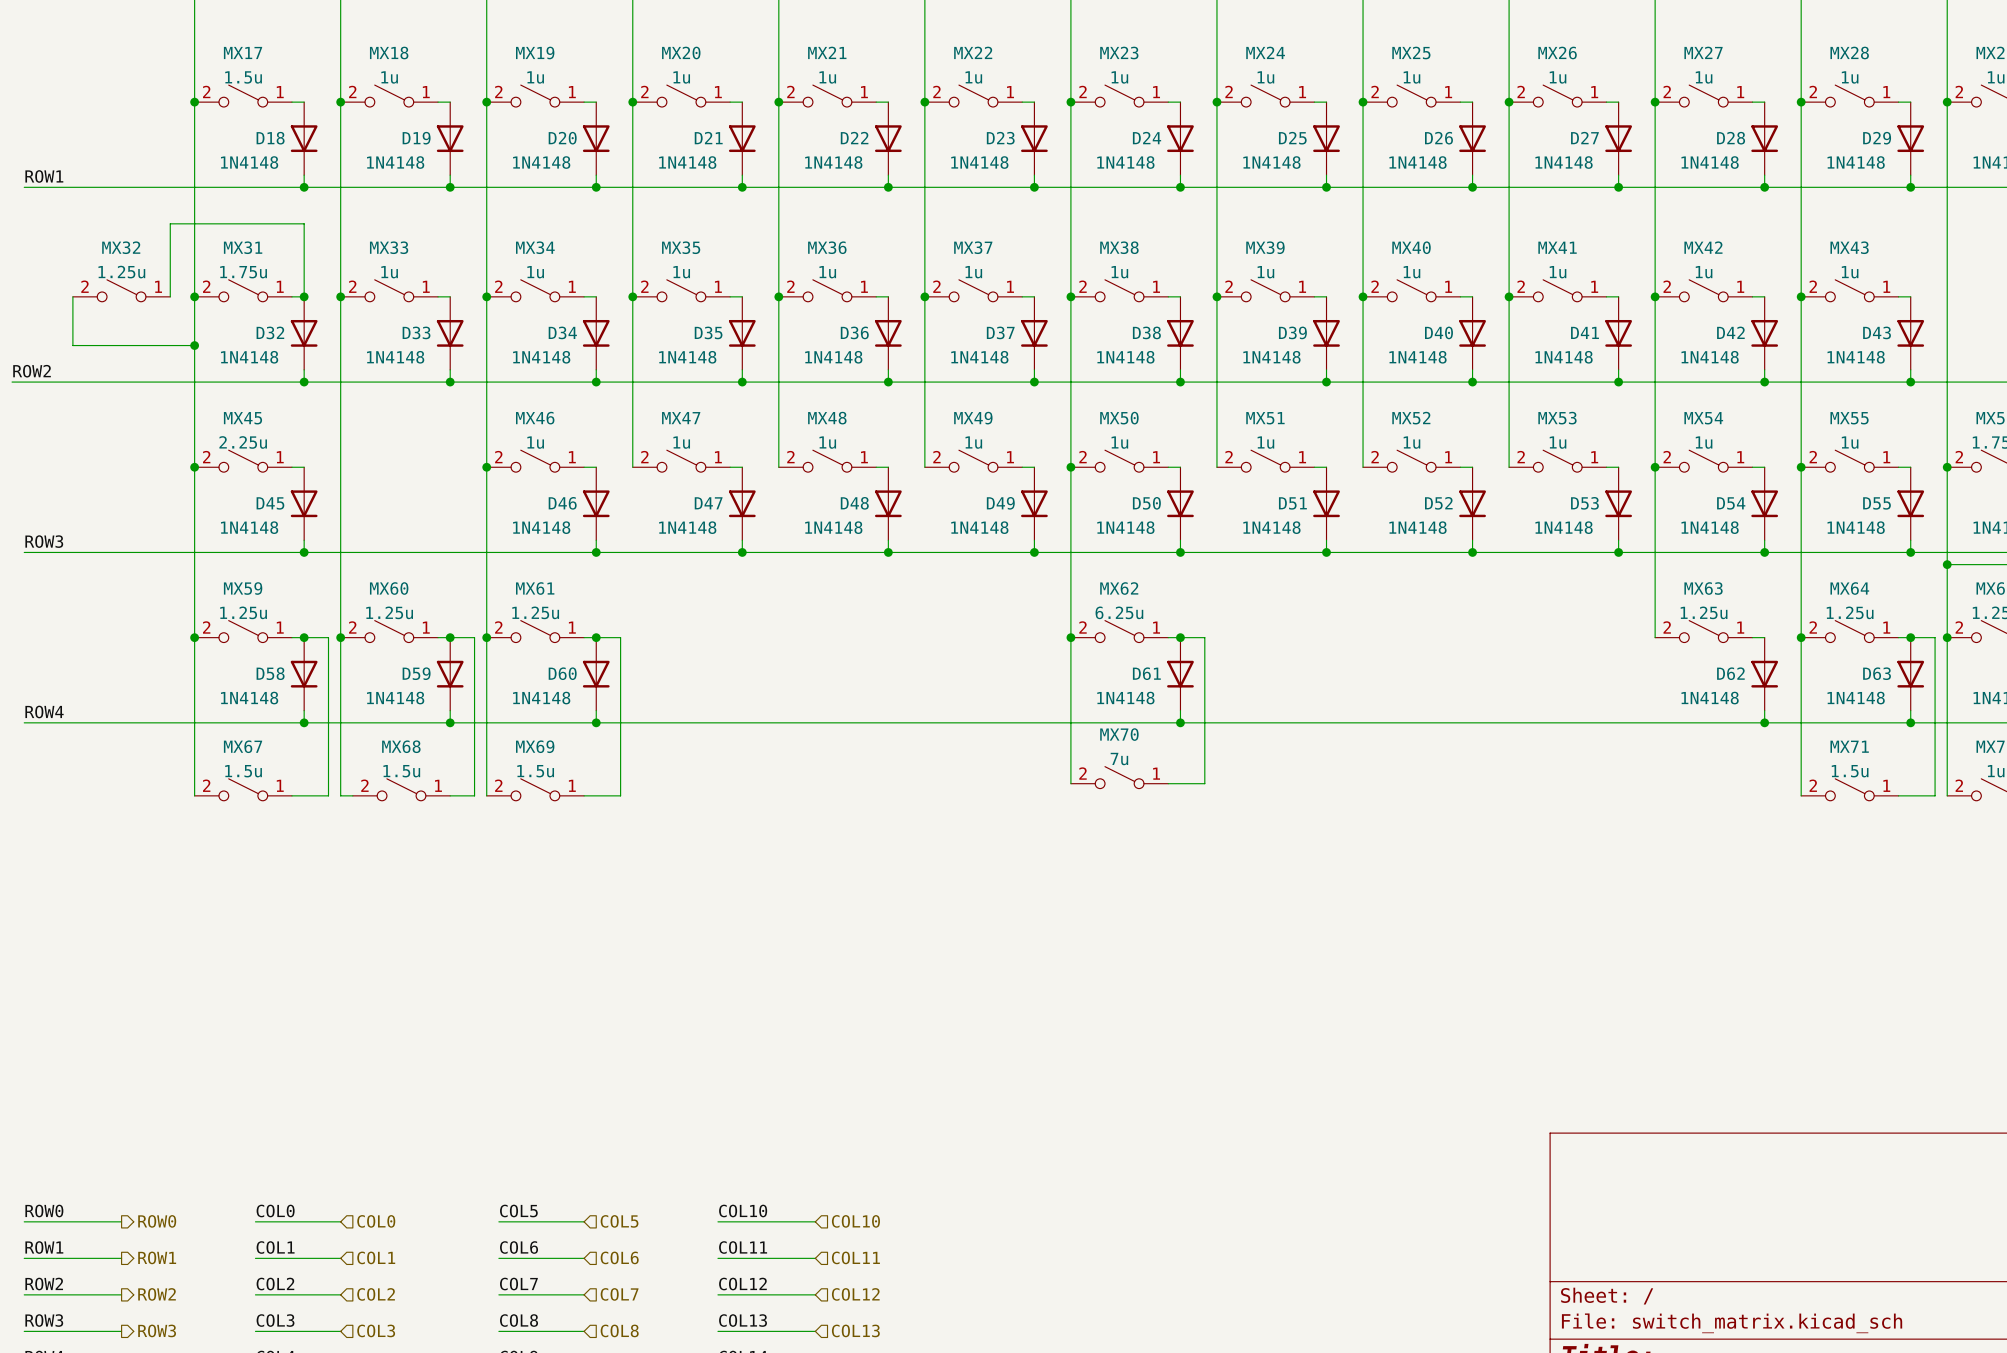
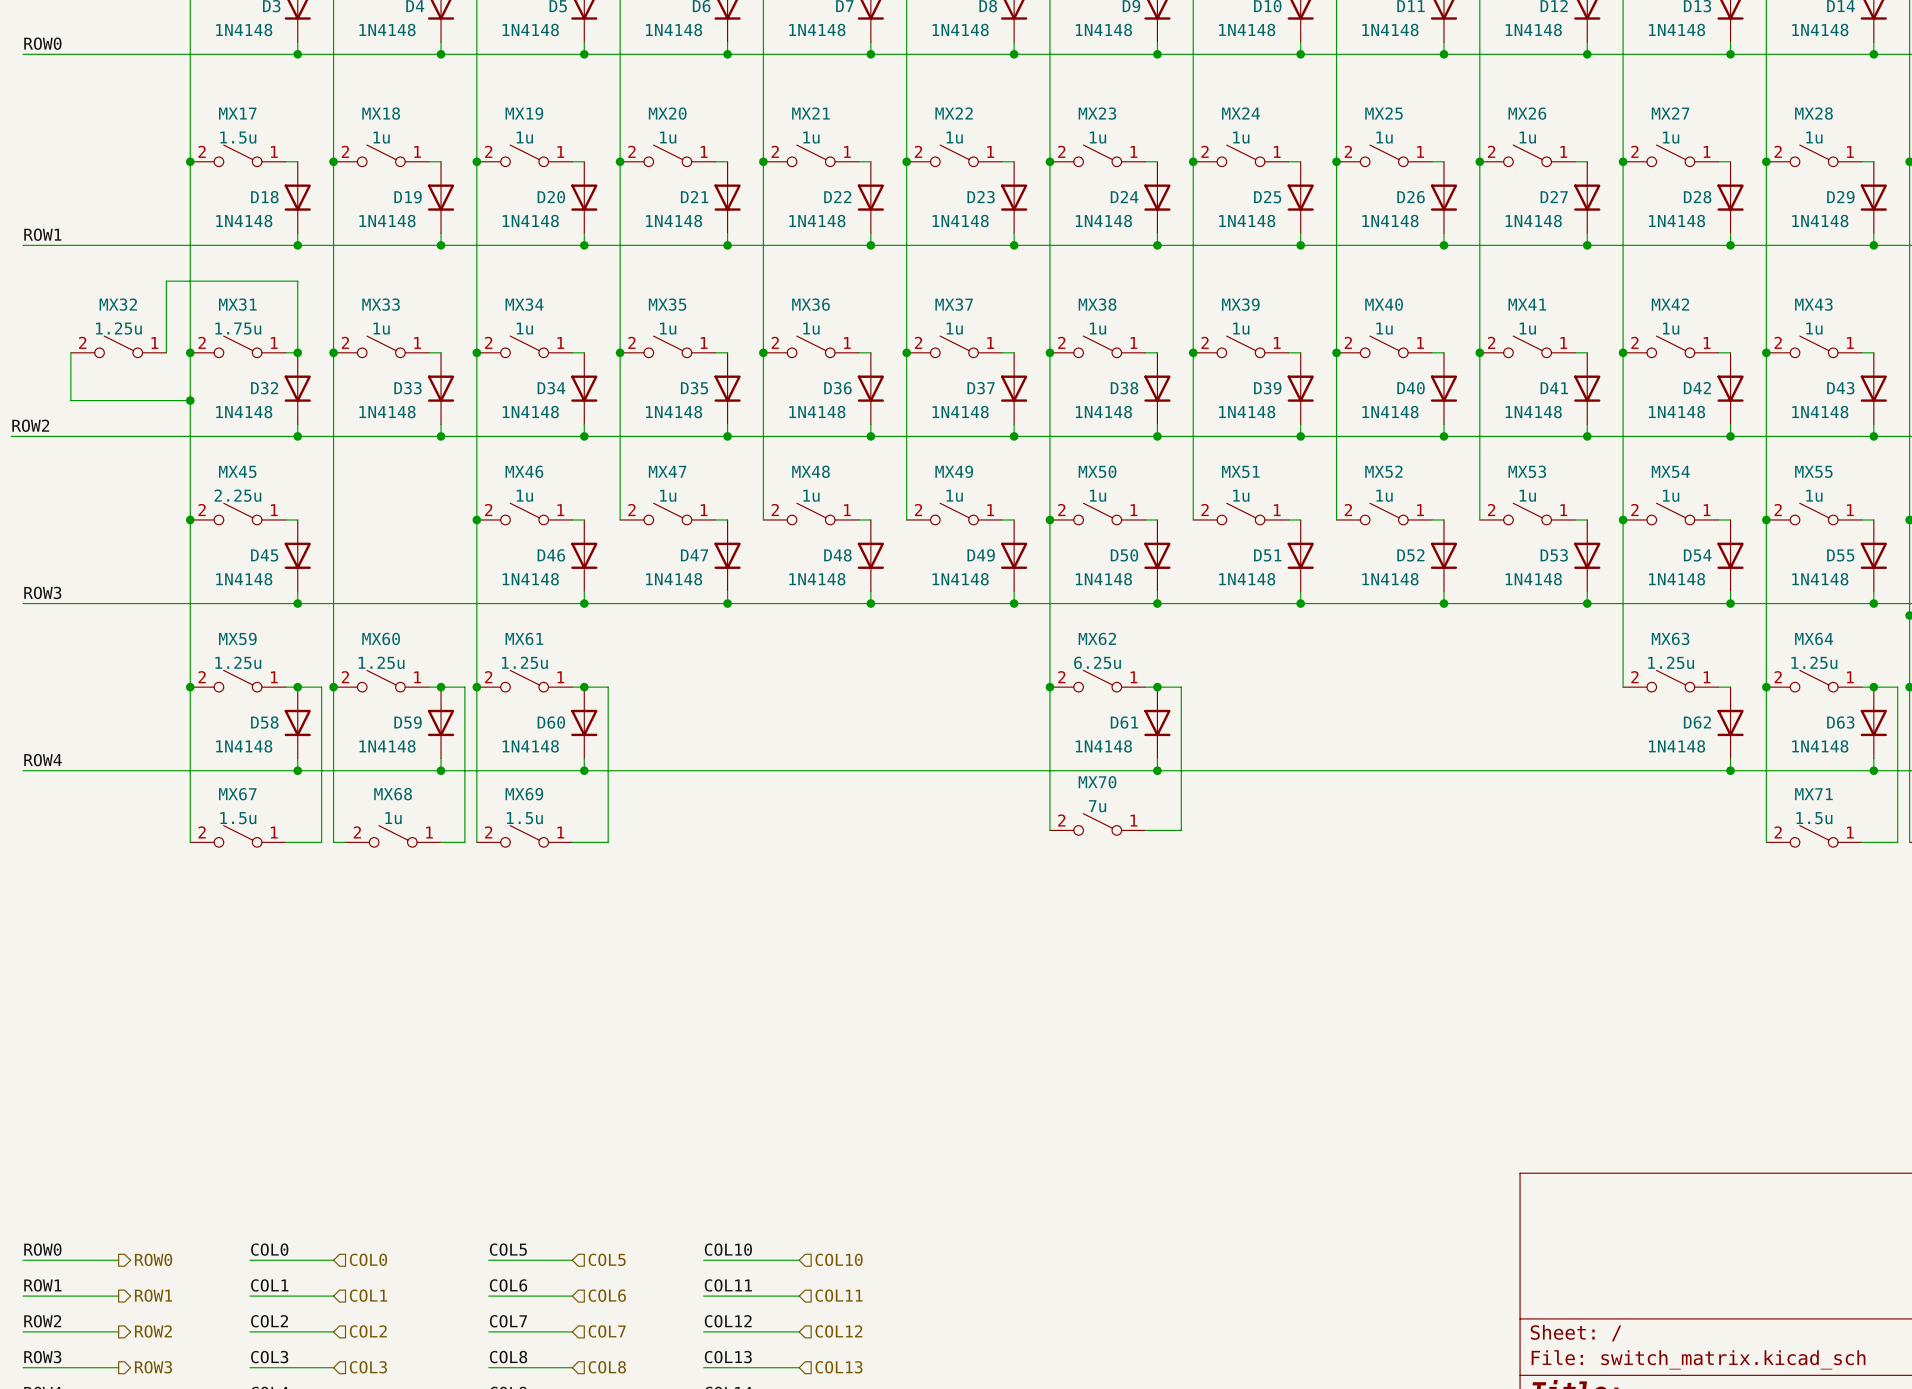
MX68 value: 1.5u (401, 771) -> 1u (393, 818)

